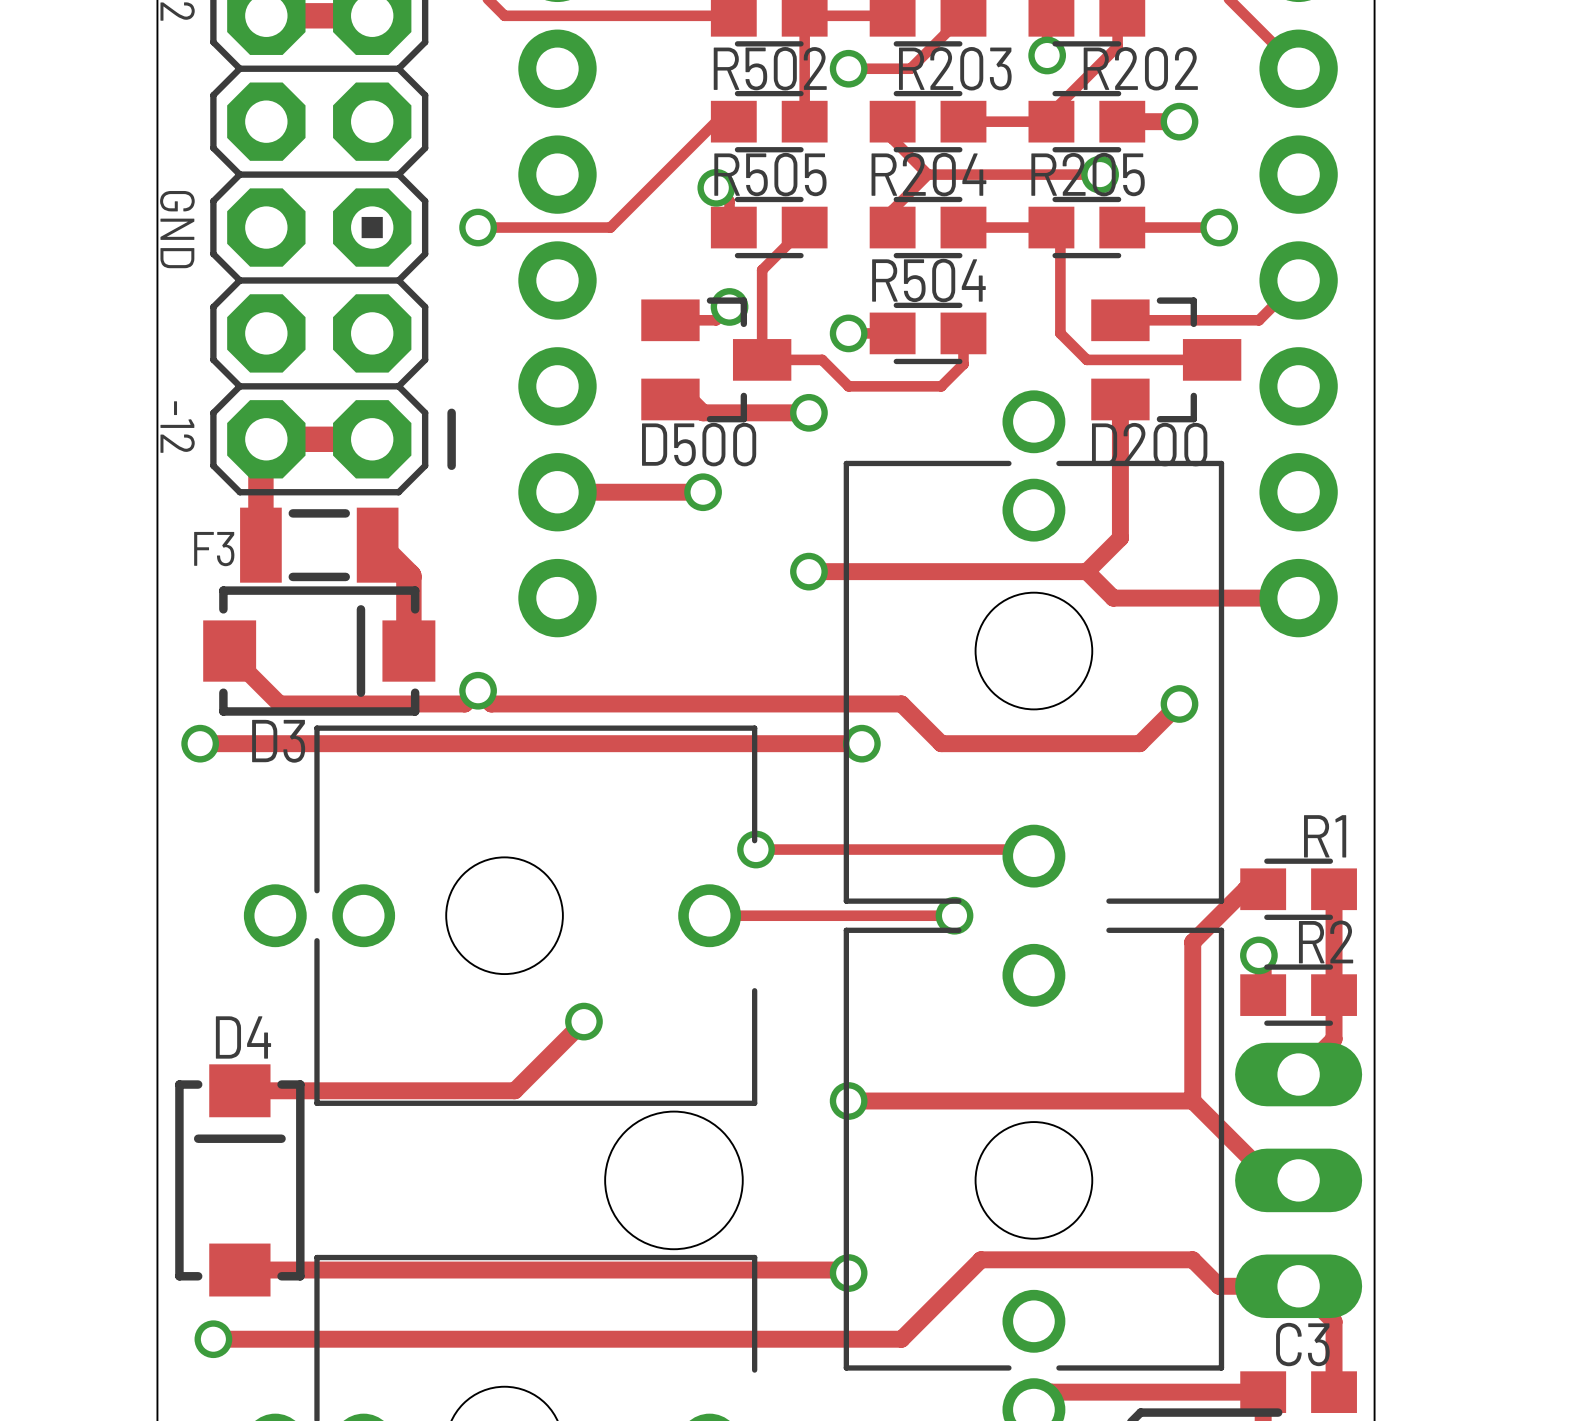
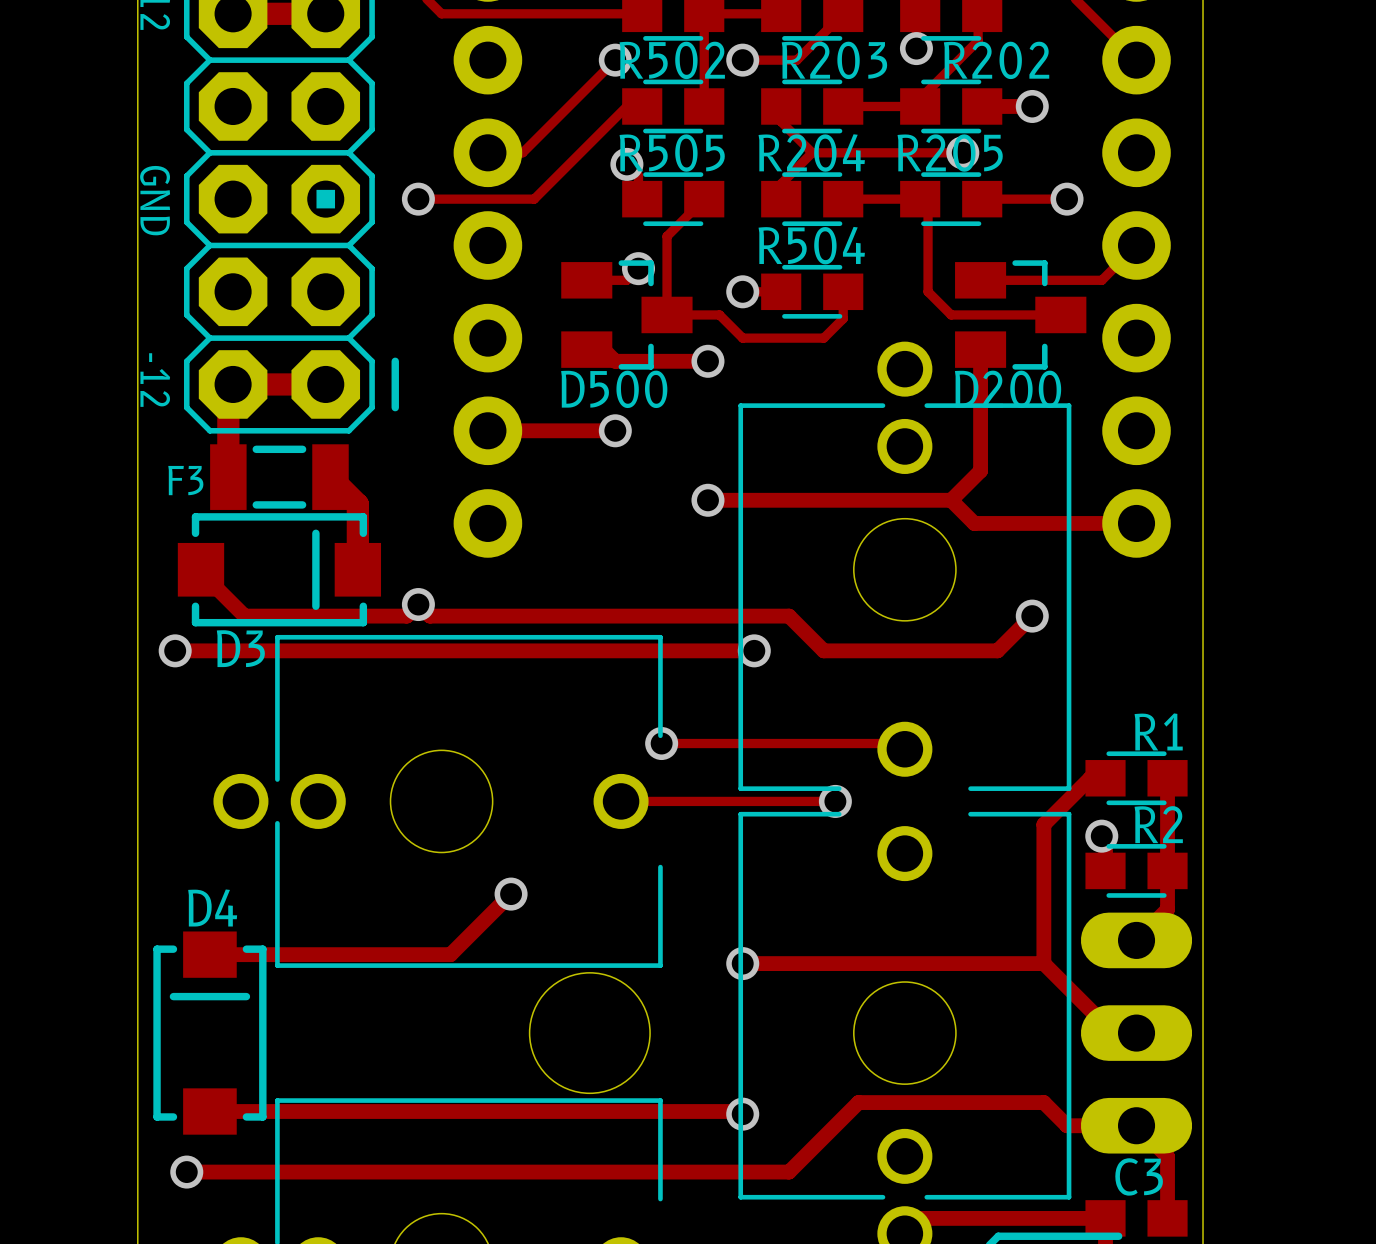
track: none -> (615, 60) (522, 152) (487, 152)
via: none -> (615, 60)

